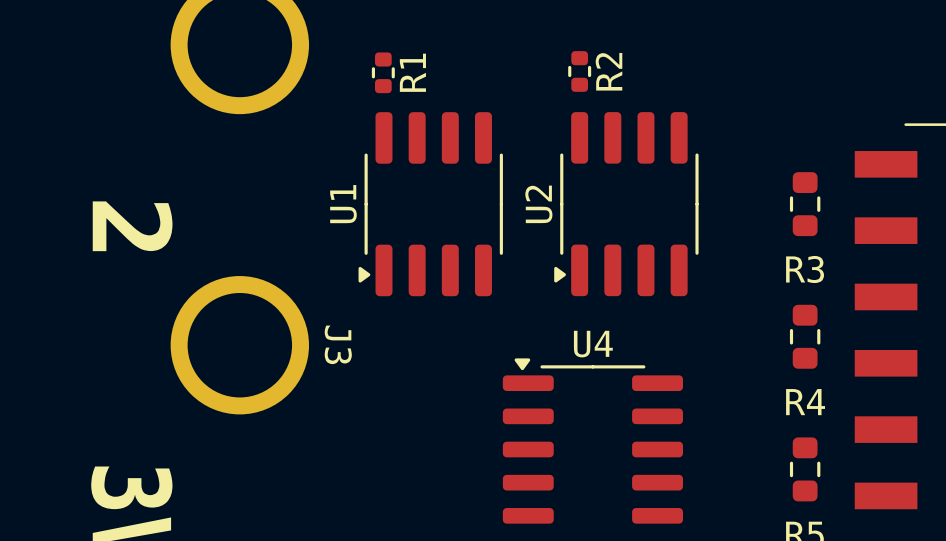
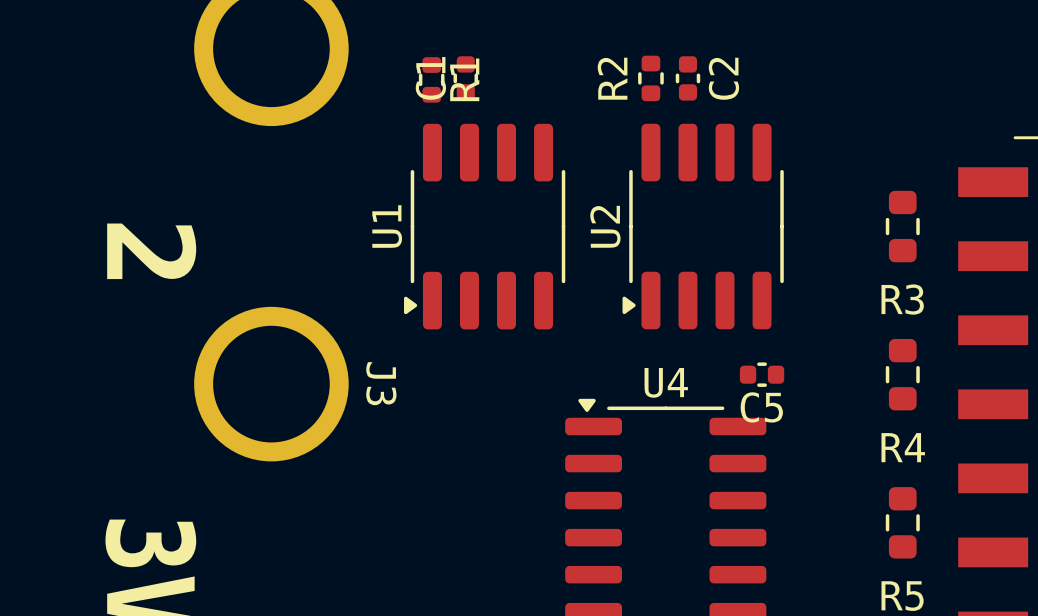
C1: none -> (465, 78)
R2 name position: R2 (608, 71) -> R2 (612, 78)
C2: none -> (687, 78)
C5: none -> (762, 374)

